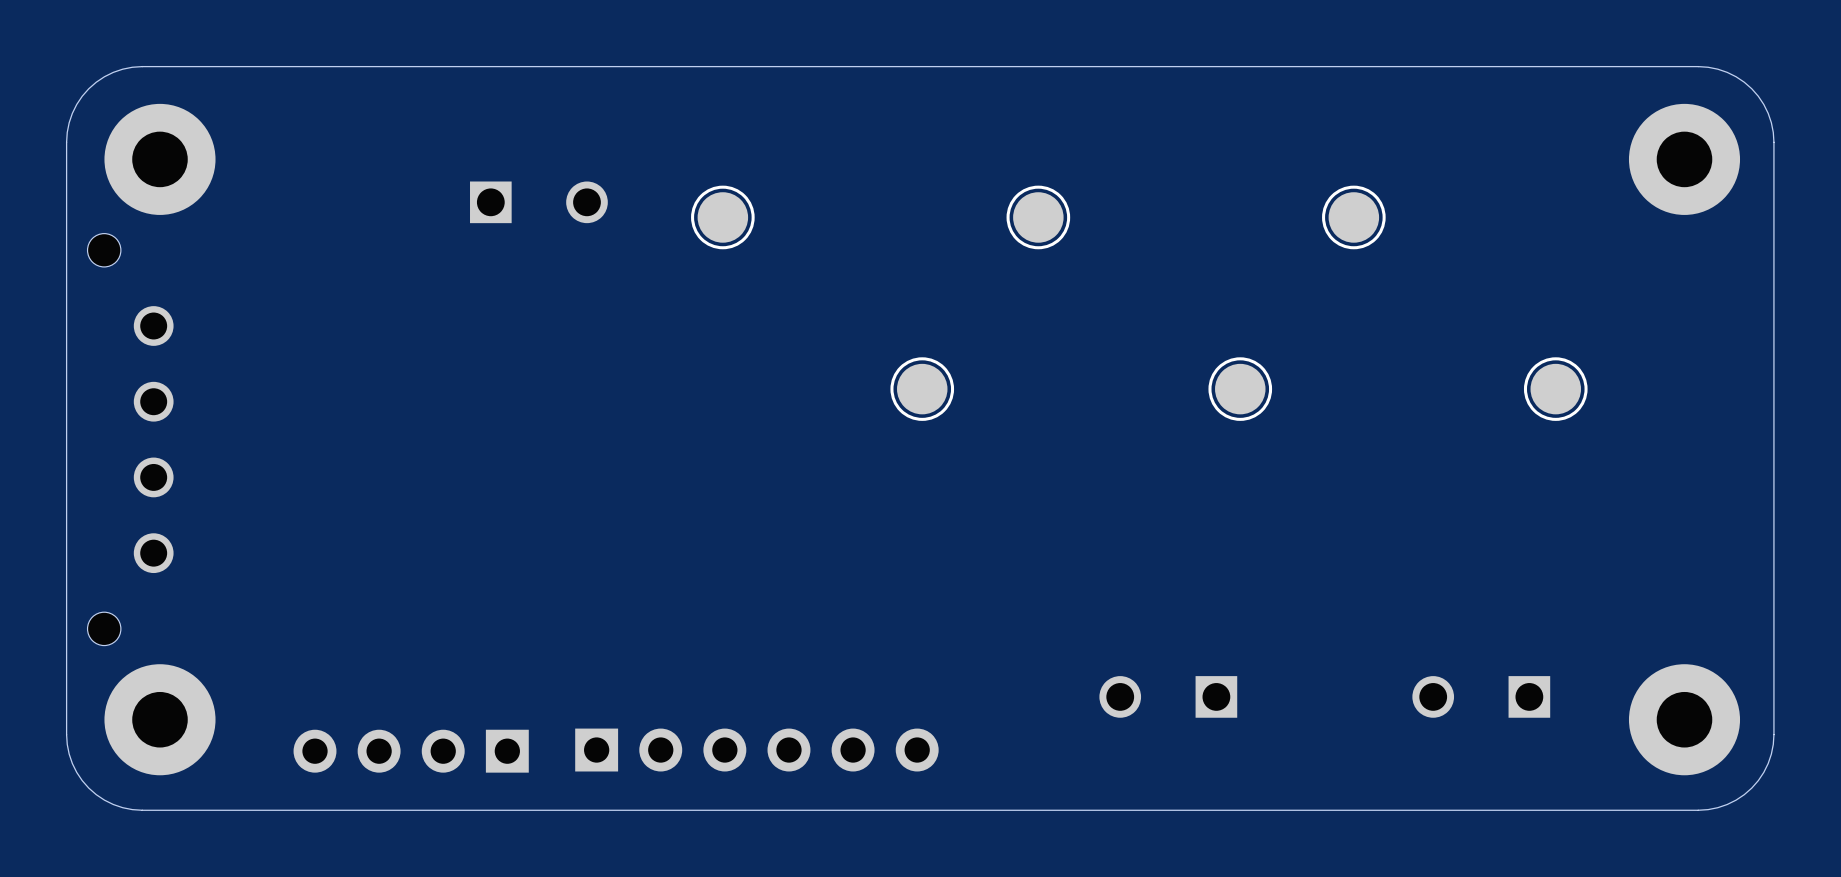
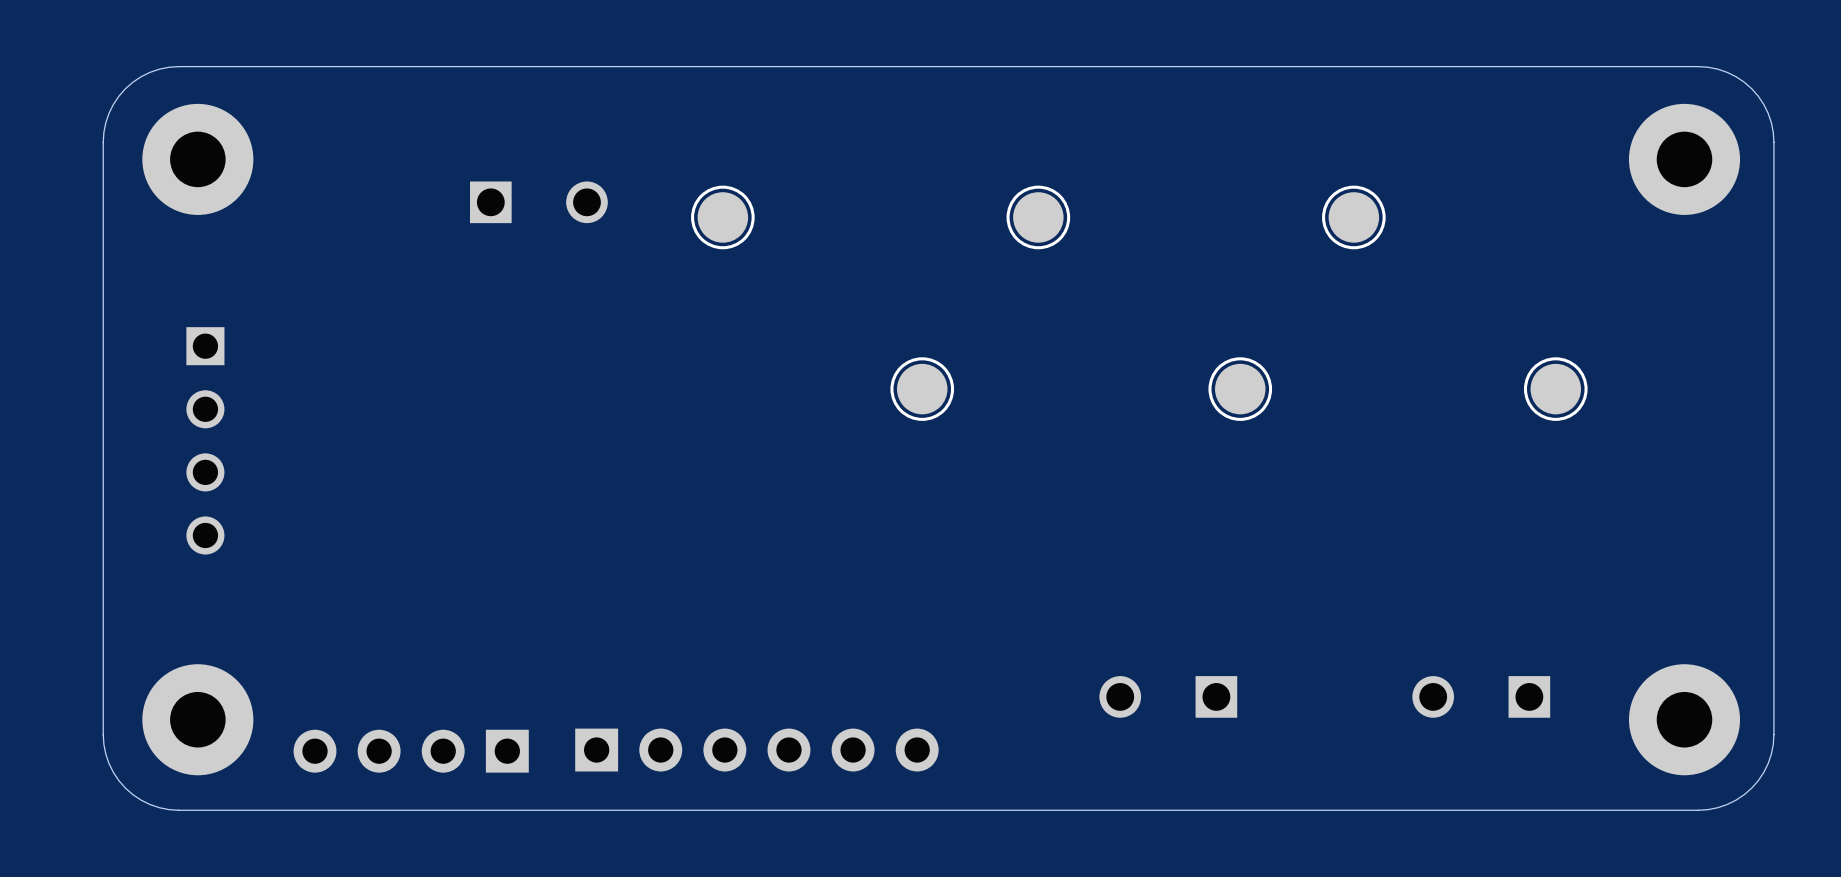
board edge: (178, 66) (132, 67) (113, 72) (96, 82) (76, 104) (69, 122) (66, 142) (67, 744) (72, 763) (82, 780) (104, 800) (132, 809) (178, 810) -> (178, 66) (149, 72) (125, 88) (109, 113) (103, 142) (103, 744) (109, 763) (125, 788) (149, 804) (178, 810)
part position: (159, 159) -> (197, 159)
part: (130, 439) -> none
part: none -> (205, 440)
part position: (159, 719) -> (197, 719)

